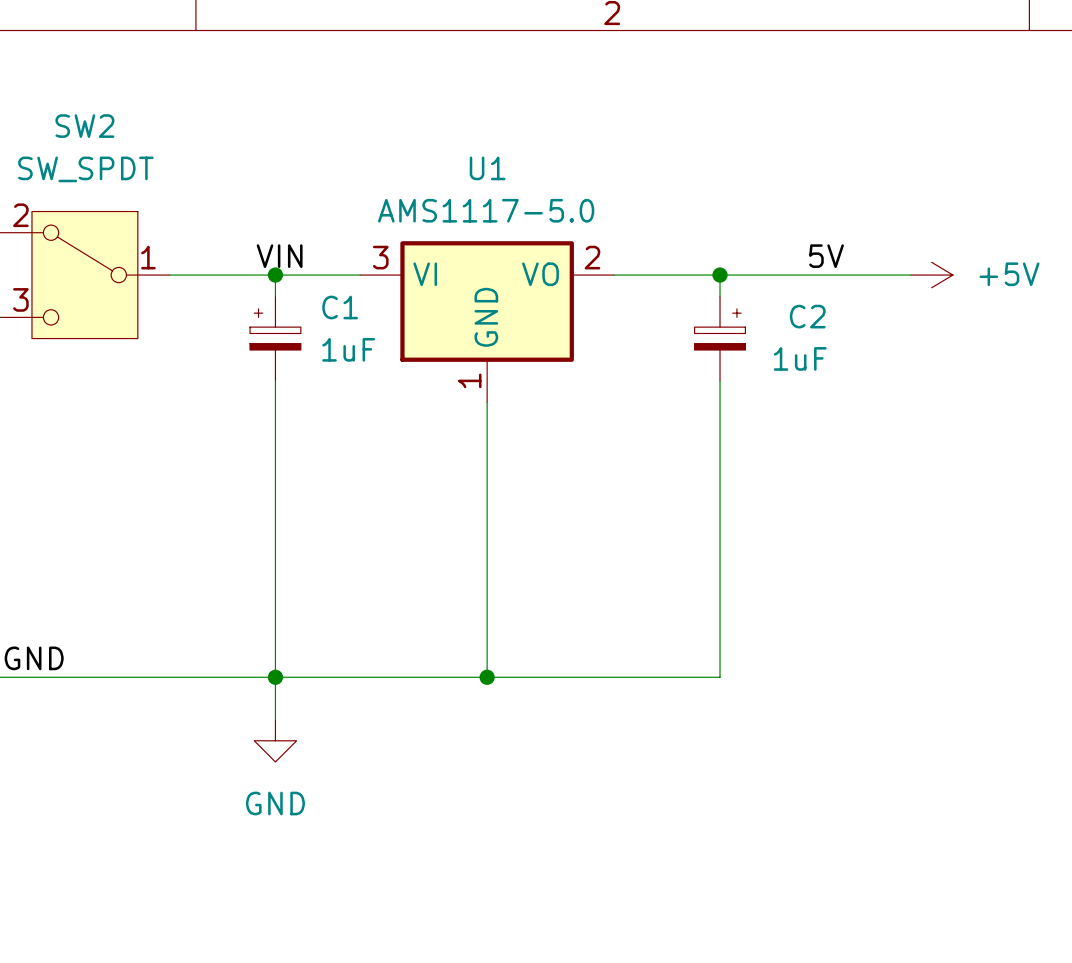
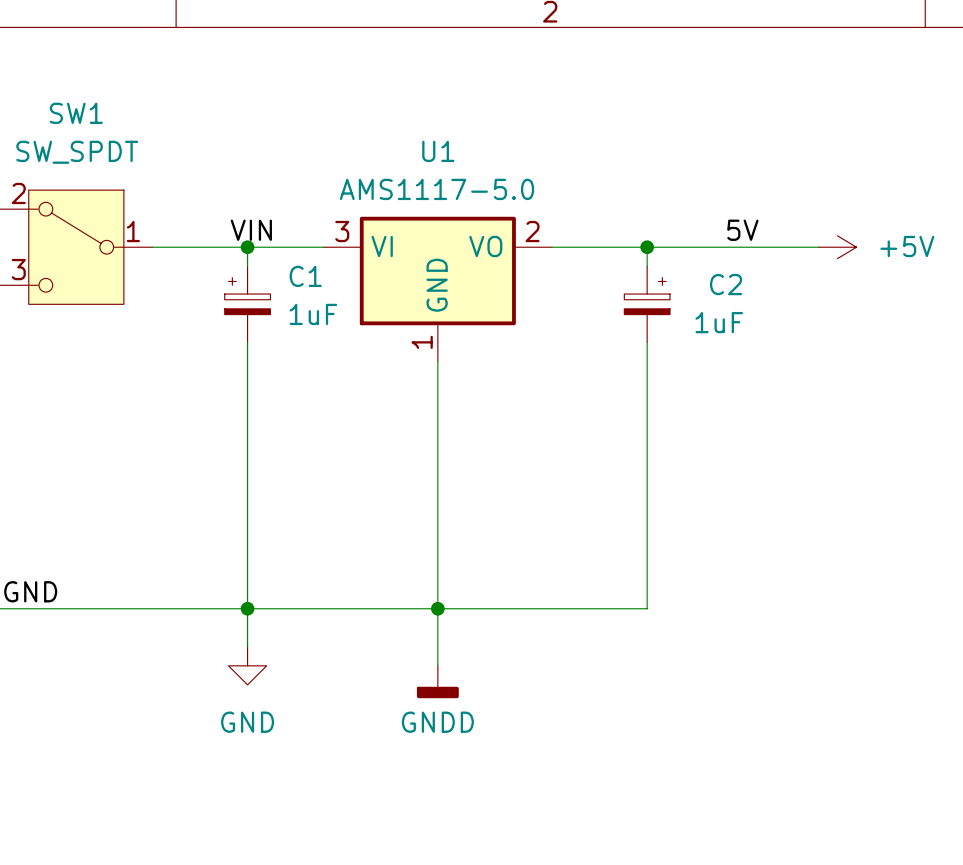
SW2 name: SW2 (84, 126) -> SW1 (76, 113)
wire: none -> (437, 608) (437, 665)
power symbol: none -> GNDD (437, 682)

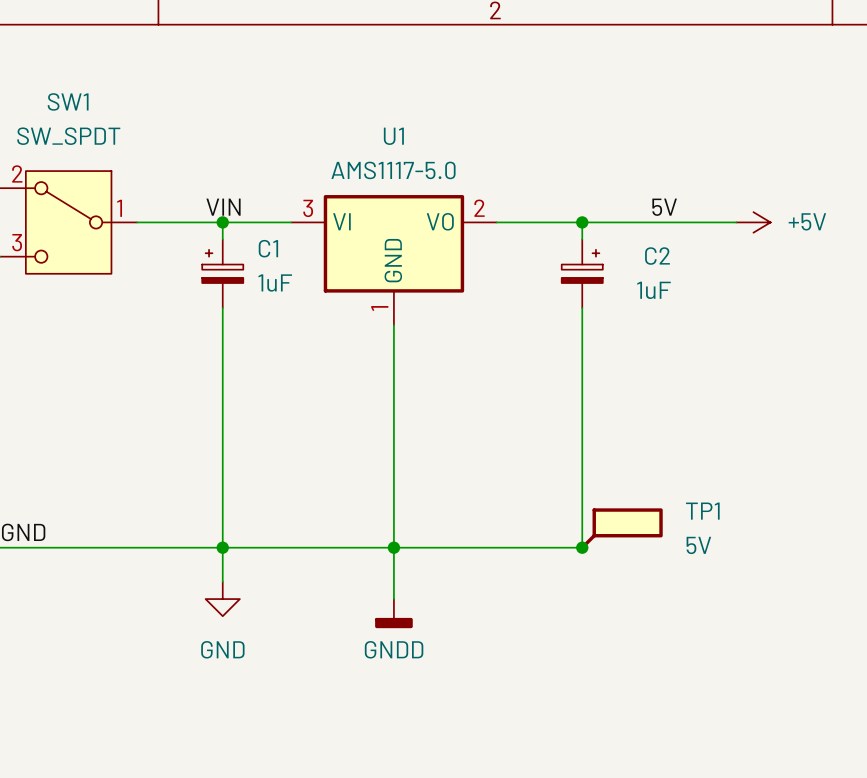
TP1: none -> 5V (621, 528)
junction: none -> (582, 547)

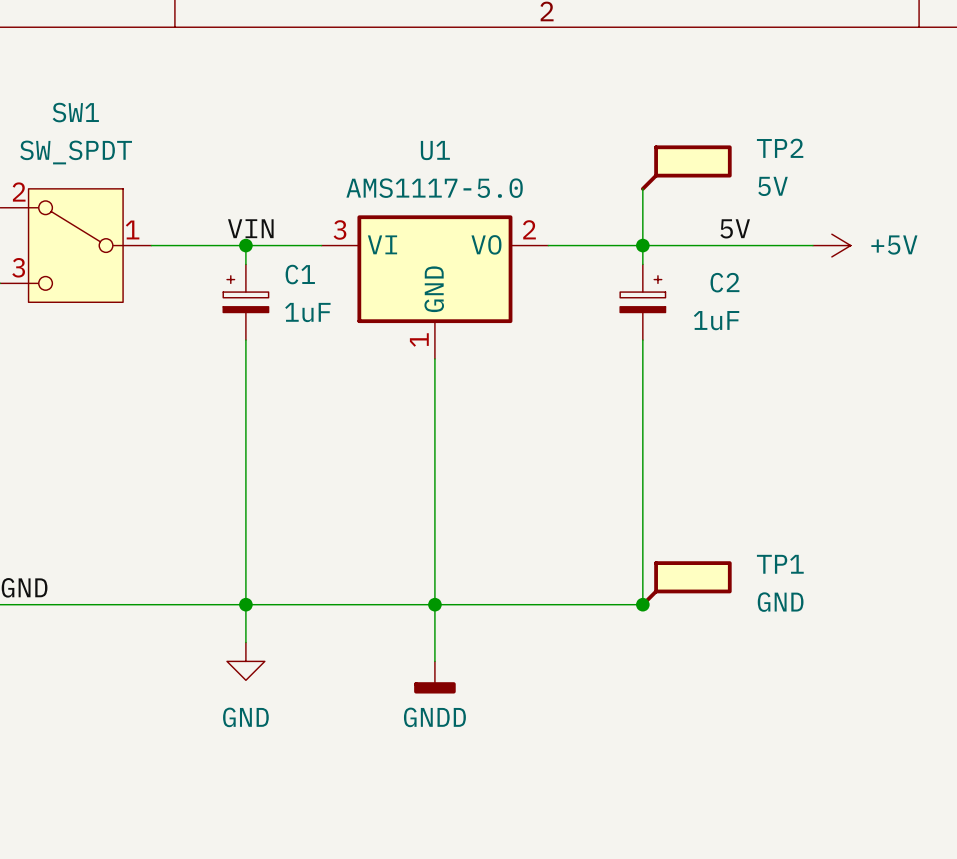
TP2: none -> 5V (686, 168)
wire: none -> (642, 188) (642, 245)
TP1 value: 5V (698, 545) -> GND (780, 602)

